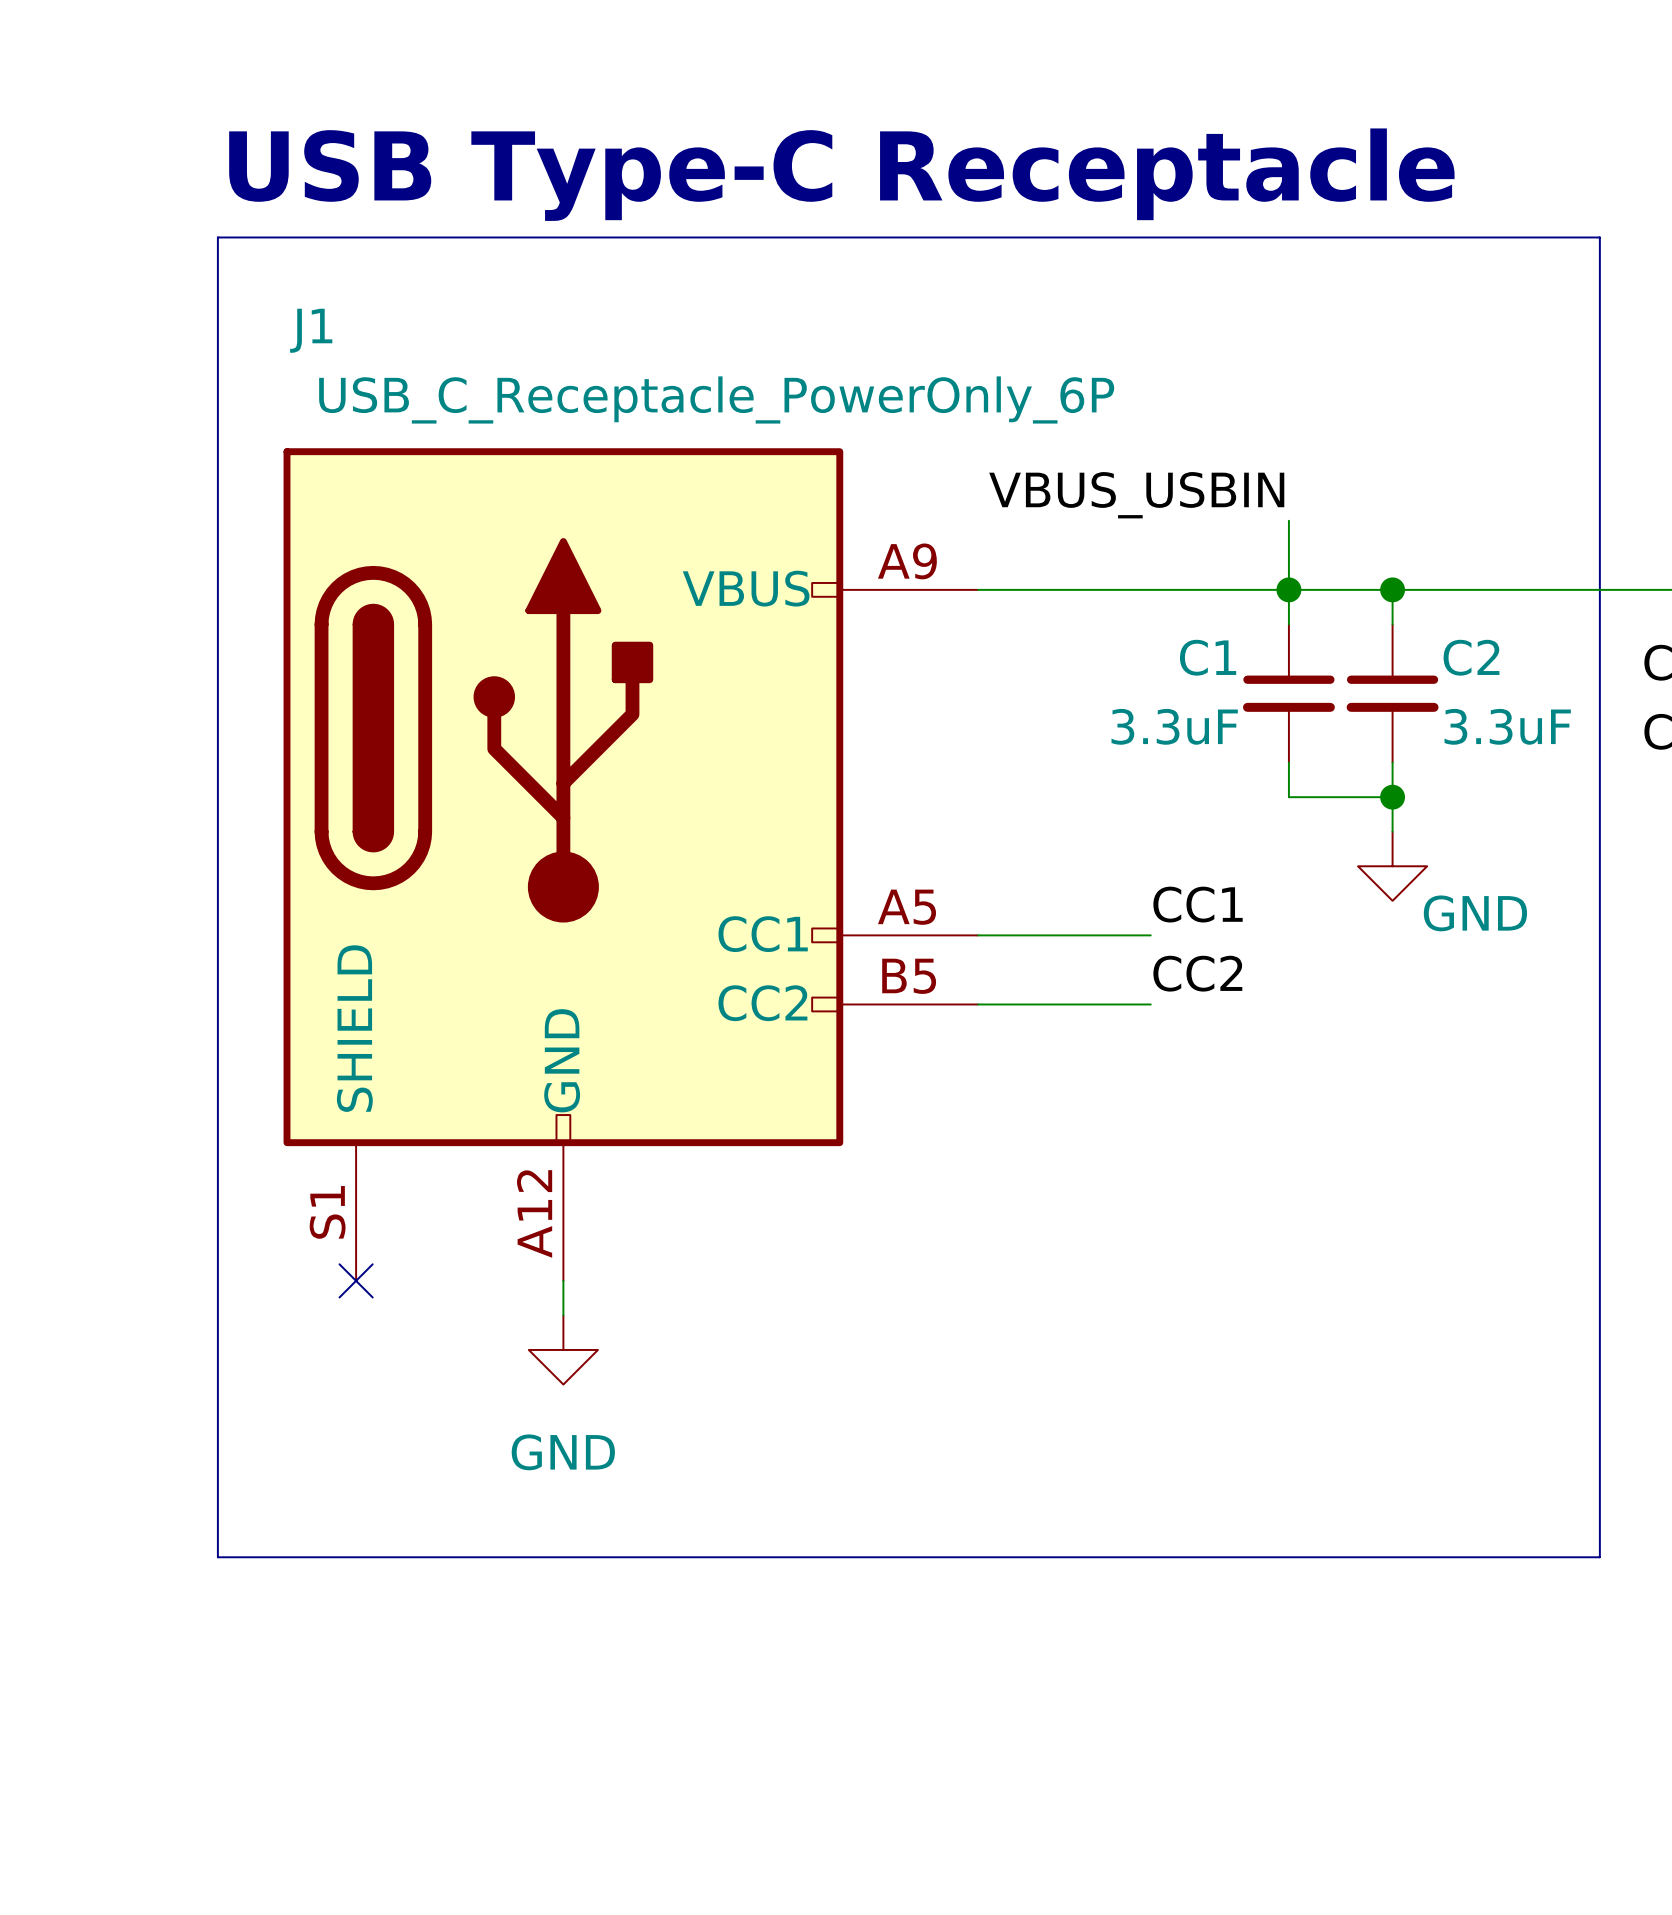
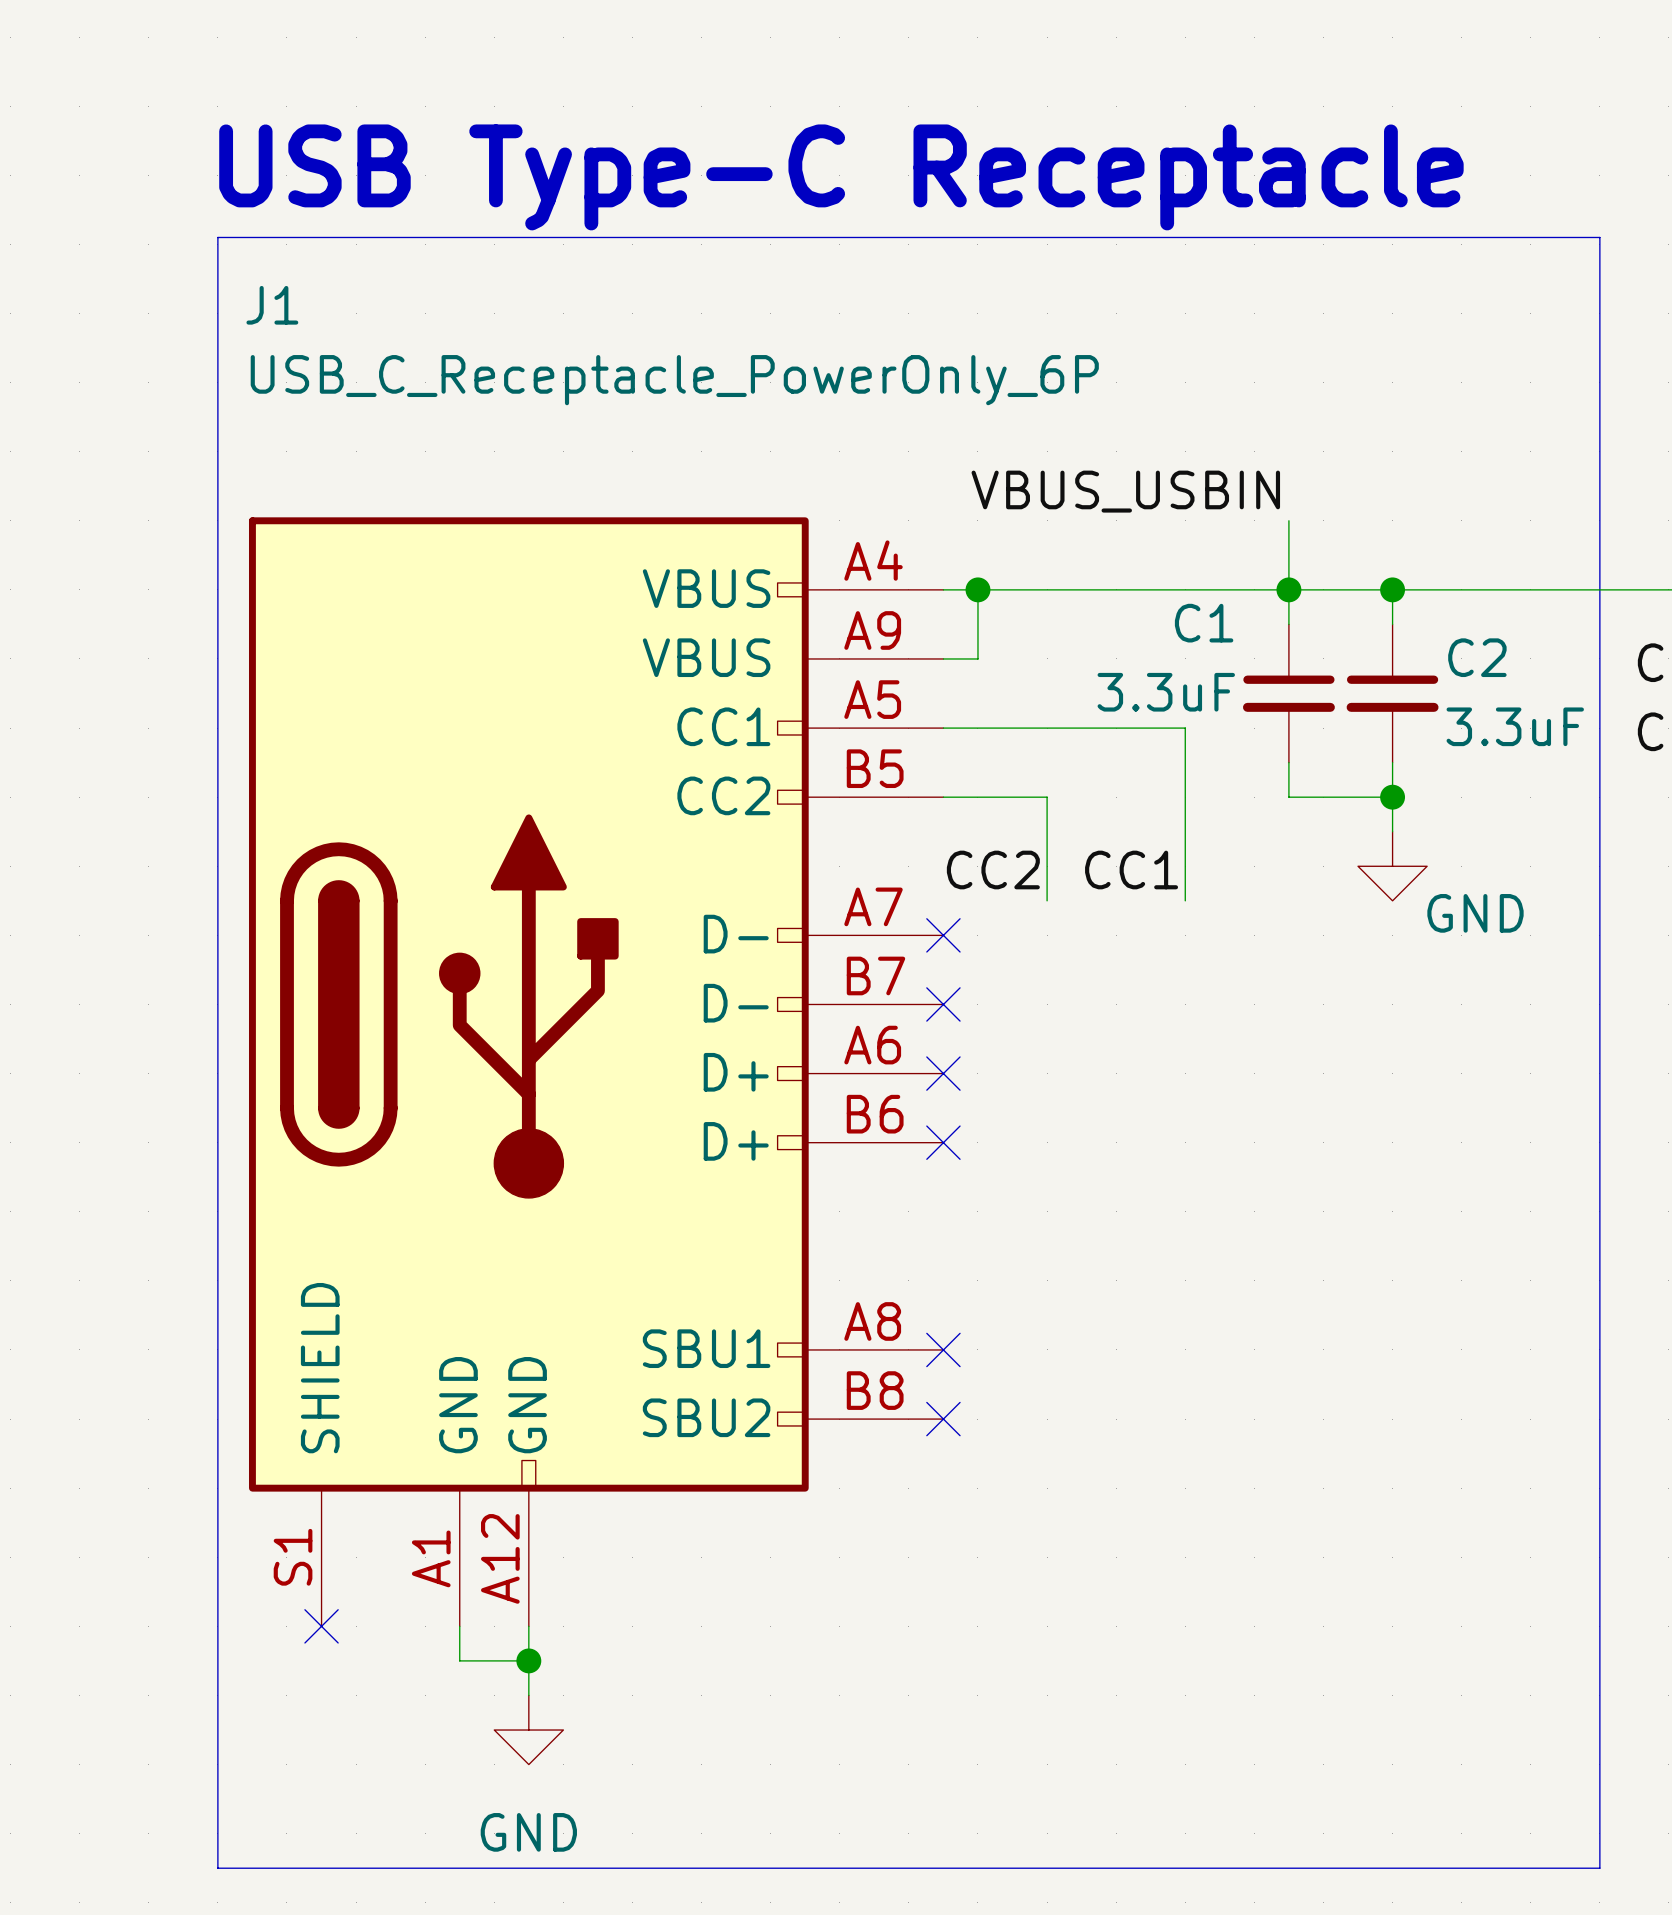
J1 name position: J1 (311, 330) -> J1 (272, 305)
J1 value position: USB_C_Receptacle_PowerOnly_6P (716, 399) -> USB_C_Receptacle_PowerOnly_6P (674, 380)
J1 symbol: [283, 448, 978, 1281] -> [248, 517, 944, 1627]
wire: none -> (943, 589) (977, 589) (977, 658) (943, 658)
junction: none -> (977, 589)
C1 name position: C1 (1208, 657) -> C1 (1204, 623)
C1 value position: 3.3uF (1174, 726) -> 3.3uF (1166, 692)
wire: none -> (943, 728) (1185, 728) (1185, 900)
wire: none -> (943, 797) (1047, 797) (1047, 900)
label position: CC1 (1198, 904) -> CC1 (1131, 870)
no-connect mark: none -> (943, 935)
wire: (977, 935) (1150, 935) -> none
label position: CC2 (1197, 973) -> CC2 (993, 870)
no-connect mark: none -> (943, 1004)
wire: (977, 1004) (1150, 1004) -> none
no-connect mark: none -> (943, 1073)
no-connect mark: none -> (943, 1142)
no-connect mark: (356, 1280) -> none
power symbol position: GND (563, 1349) -> GND (528, 1730)
no-connect mark: none -> (943, 1349)
no-connect mark: none -> (943, 1419)
line: (217, 1557) (1599, 1557) -> (217, 1557) (217, 1868) (1599, 1868) (1599, 1557)
no-connect mark: none -> (321, 1626)
wire: none -> (459, 1626) (459, 1660) (528, 1660)
wire: none -> (528, 1626) (528, 1695)
junction: none -> (528, 1660)

